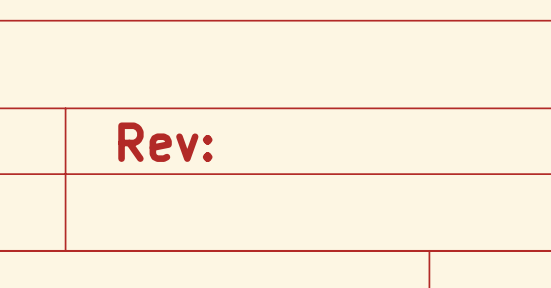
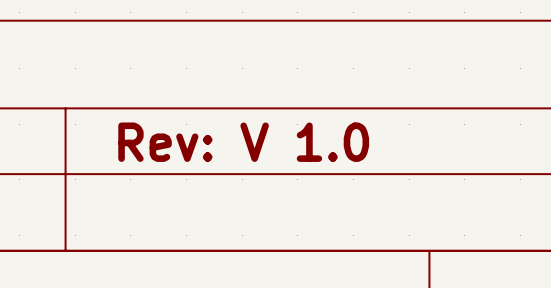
title block: Rev: (165, 142) -> Rev: V 1.0 (243, 142)

